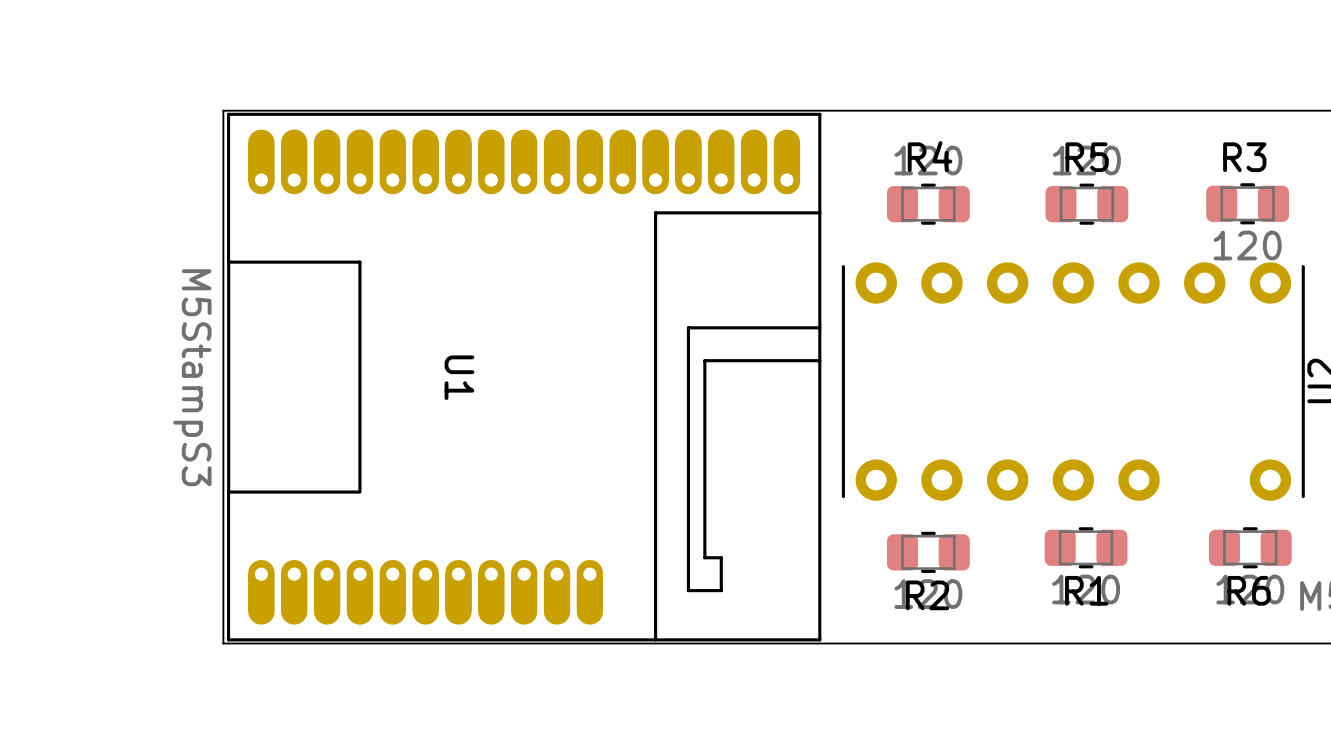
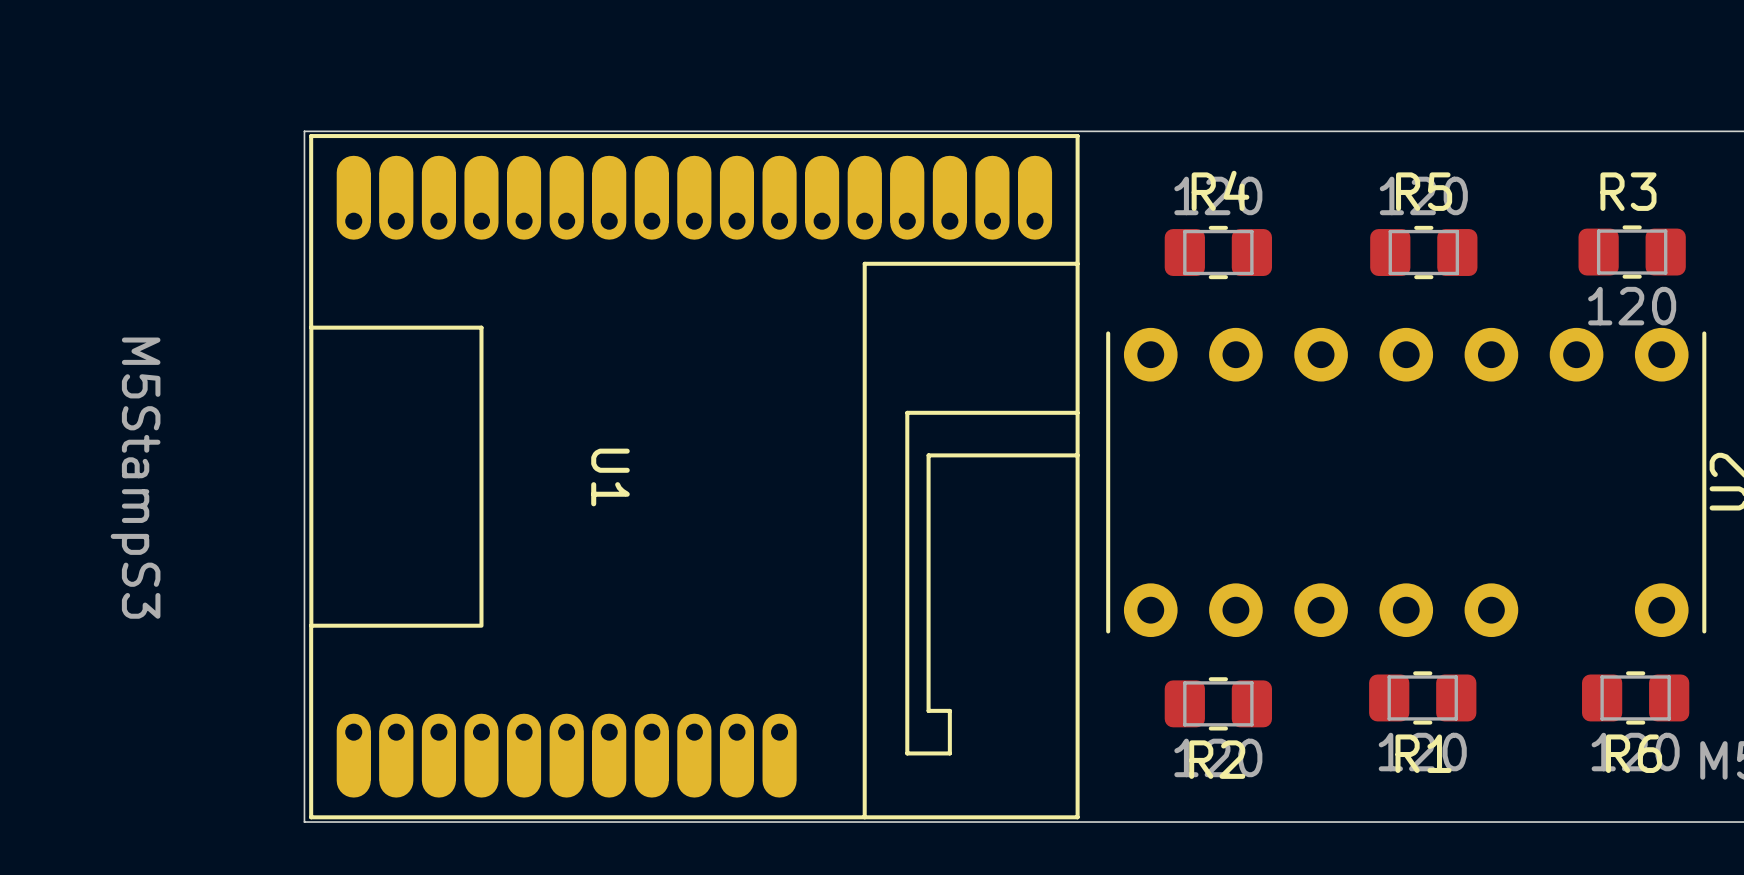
U1 value position: M5StampS3 (192, 377) -> M5StampS3 (135, 478)

